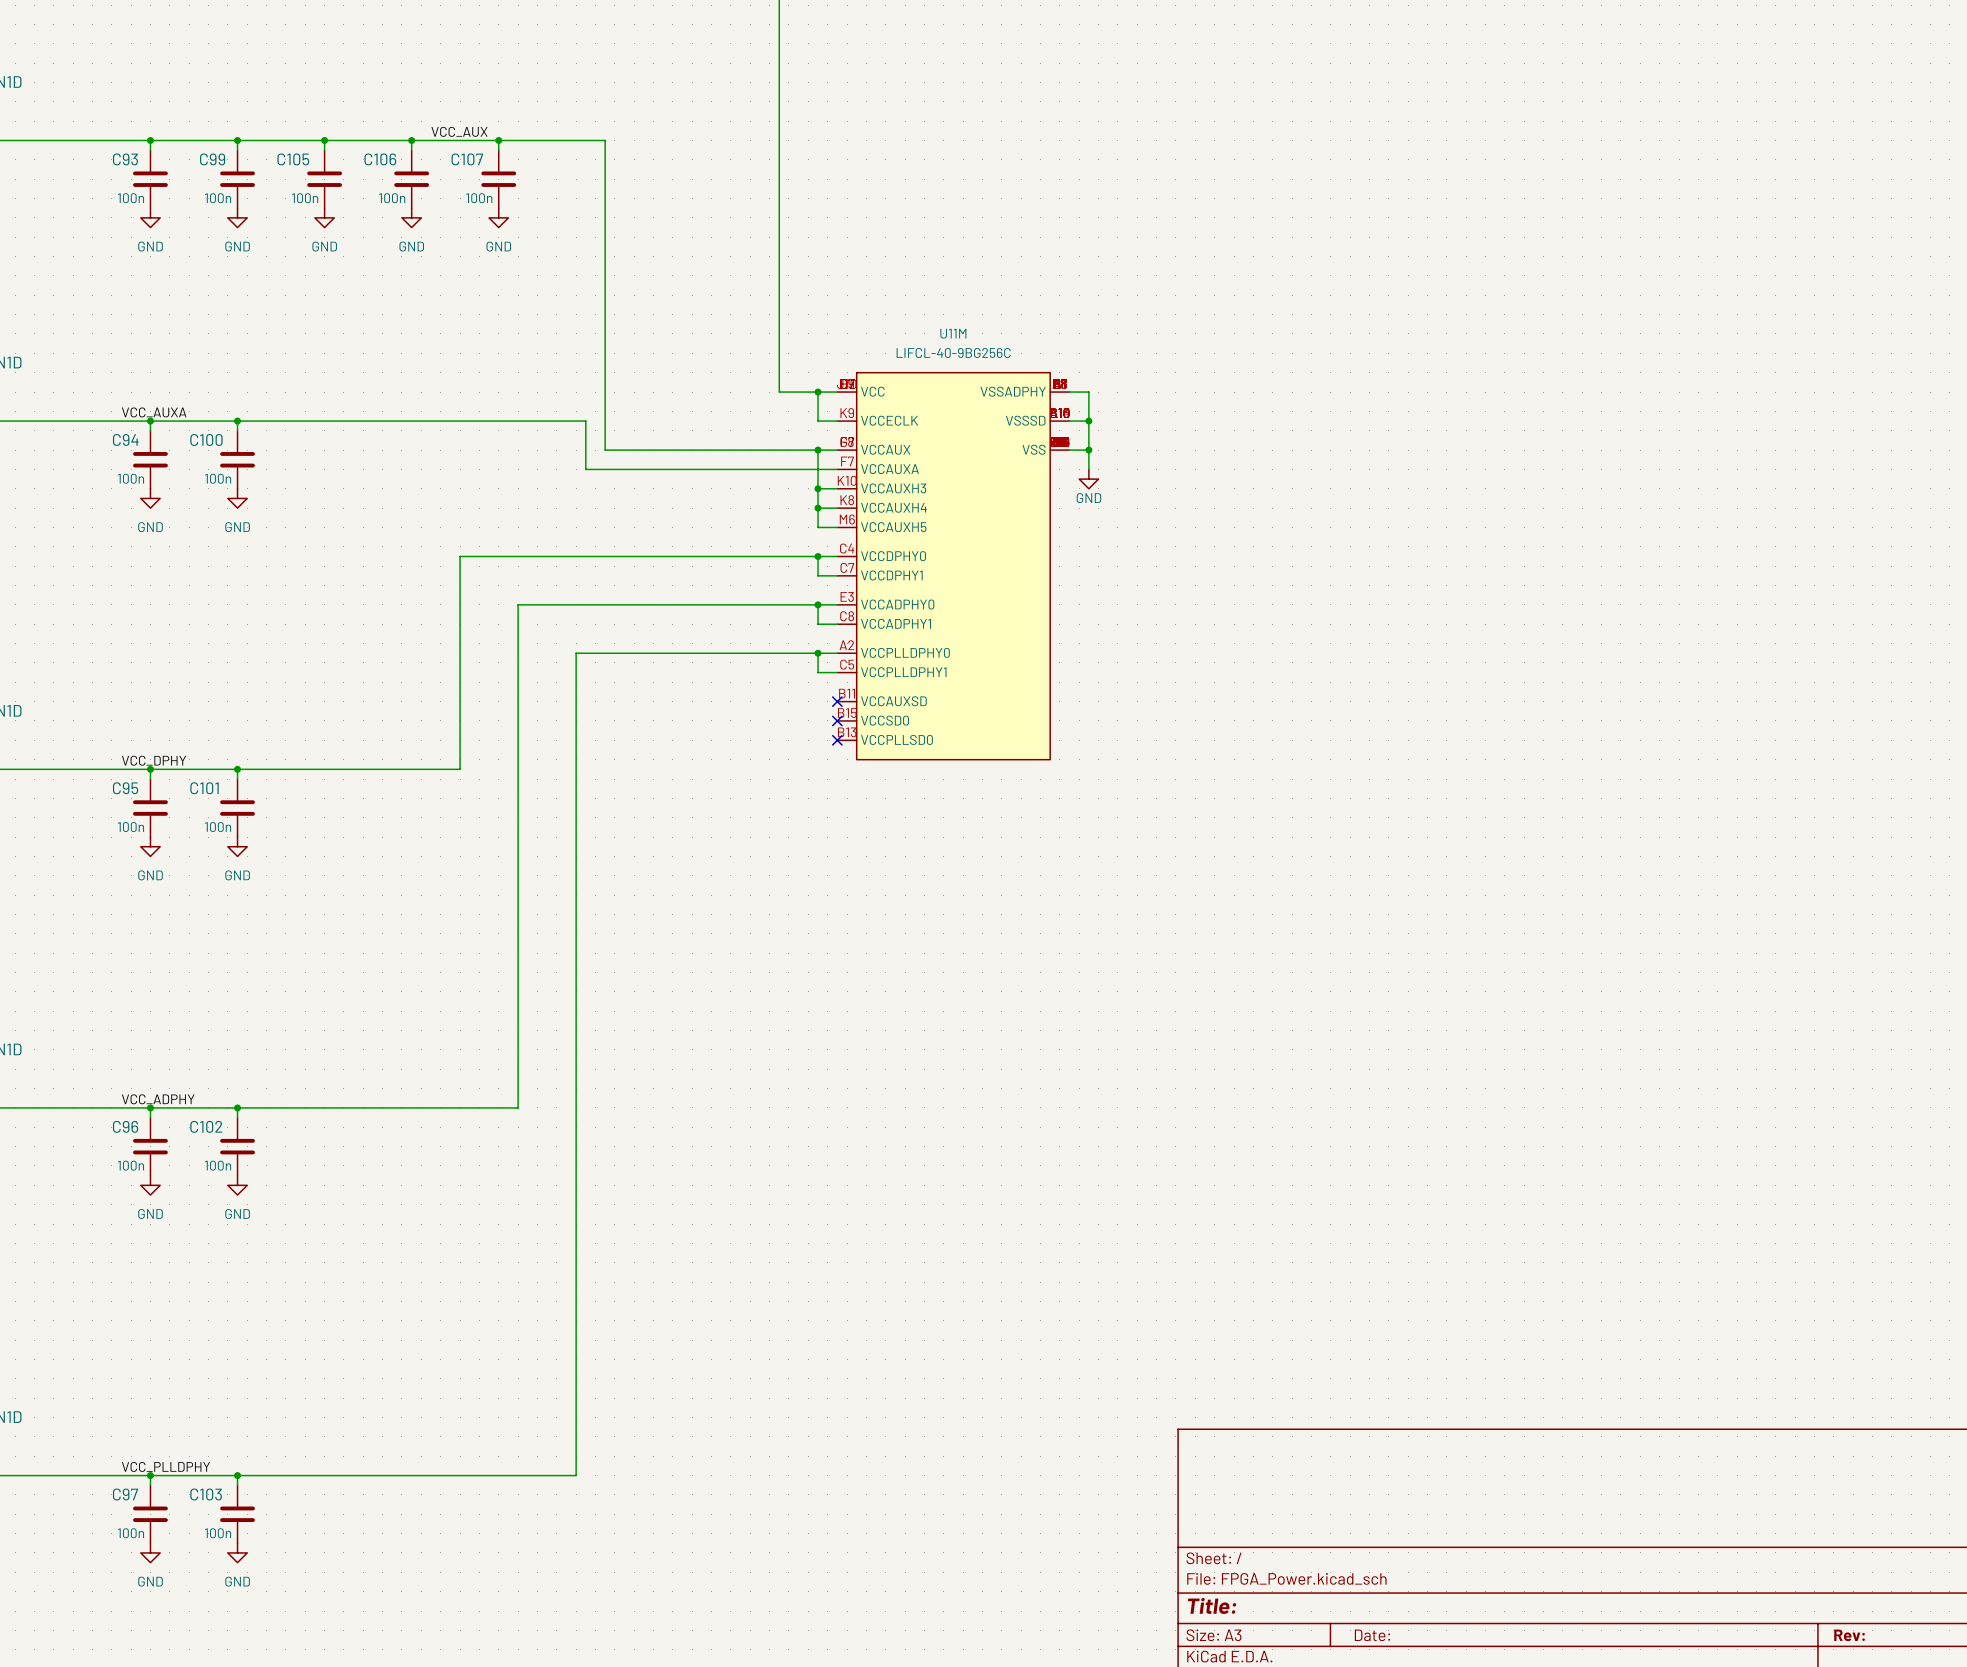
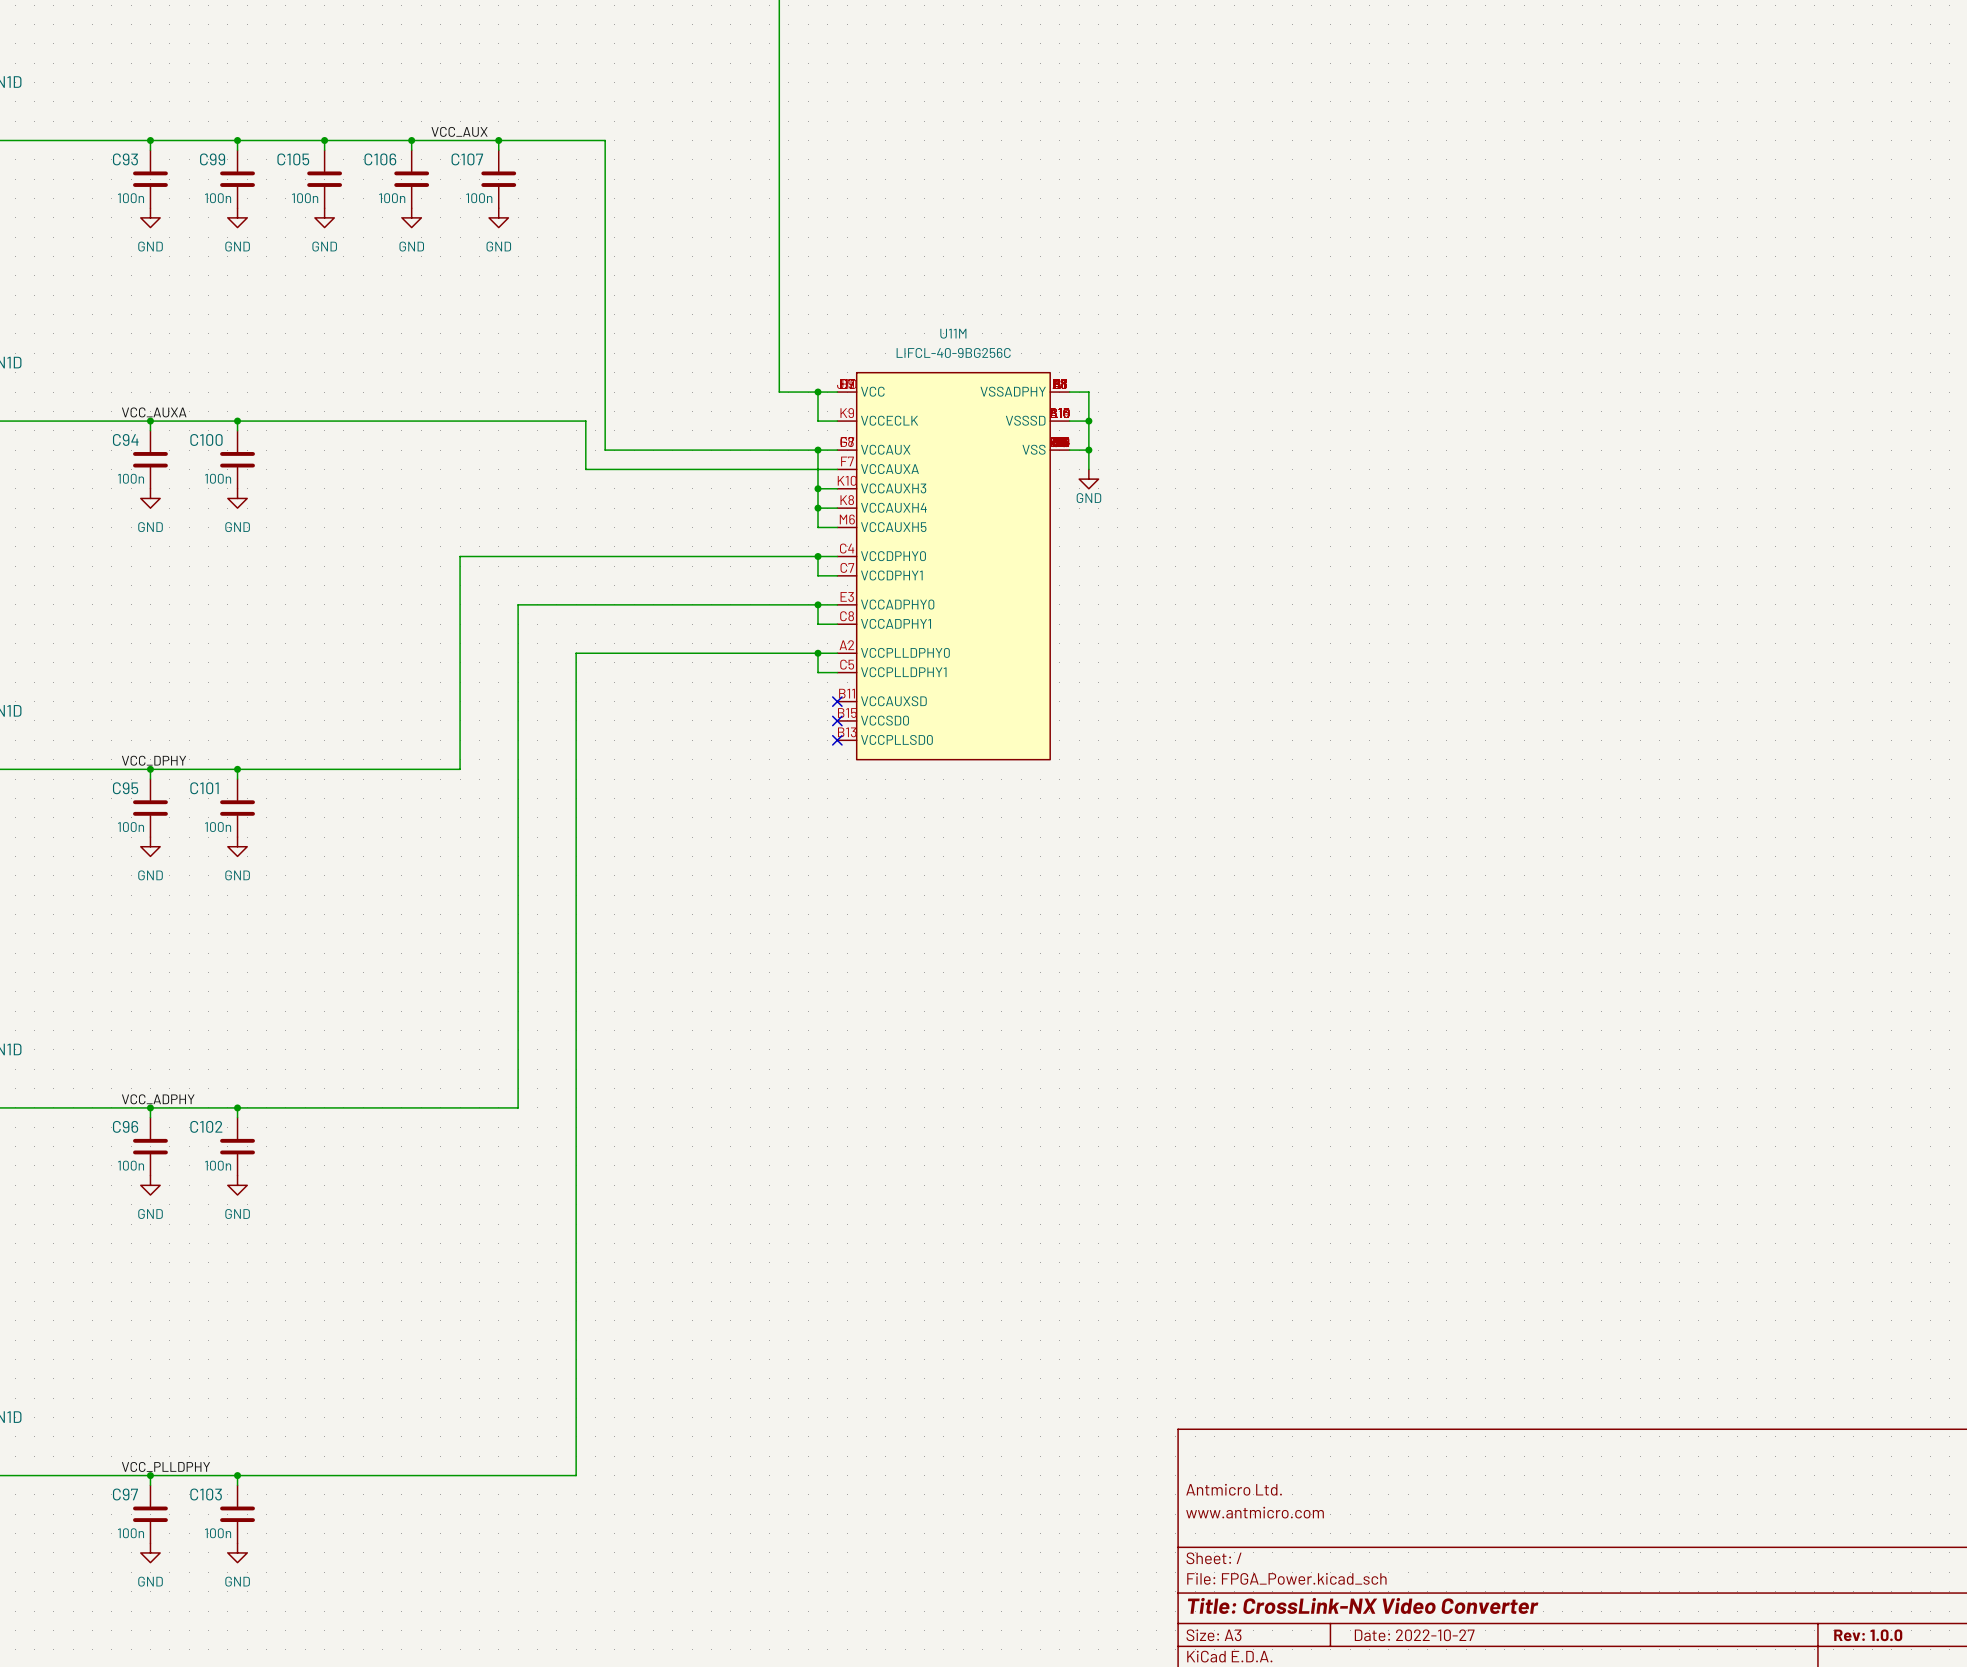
title block: none -> Antmicro Ltd. (1234, 1489)
title block: none -> www.antmicro.com (1255, 1512)
title block: Title: (1212, 1605) -> Title: CrossLink-NX Video Converter (1363, 1605)
title block: Date: (1372, 1635) -> Date: 2022-10-27 (1414, 1635)
title block: Rev: (1849, 1635) -> Rev: 1.0.0 (1868, 1635)

